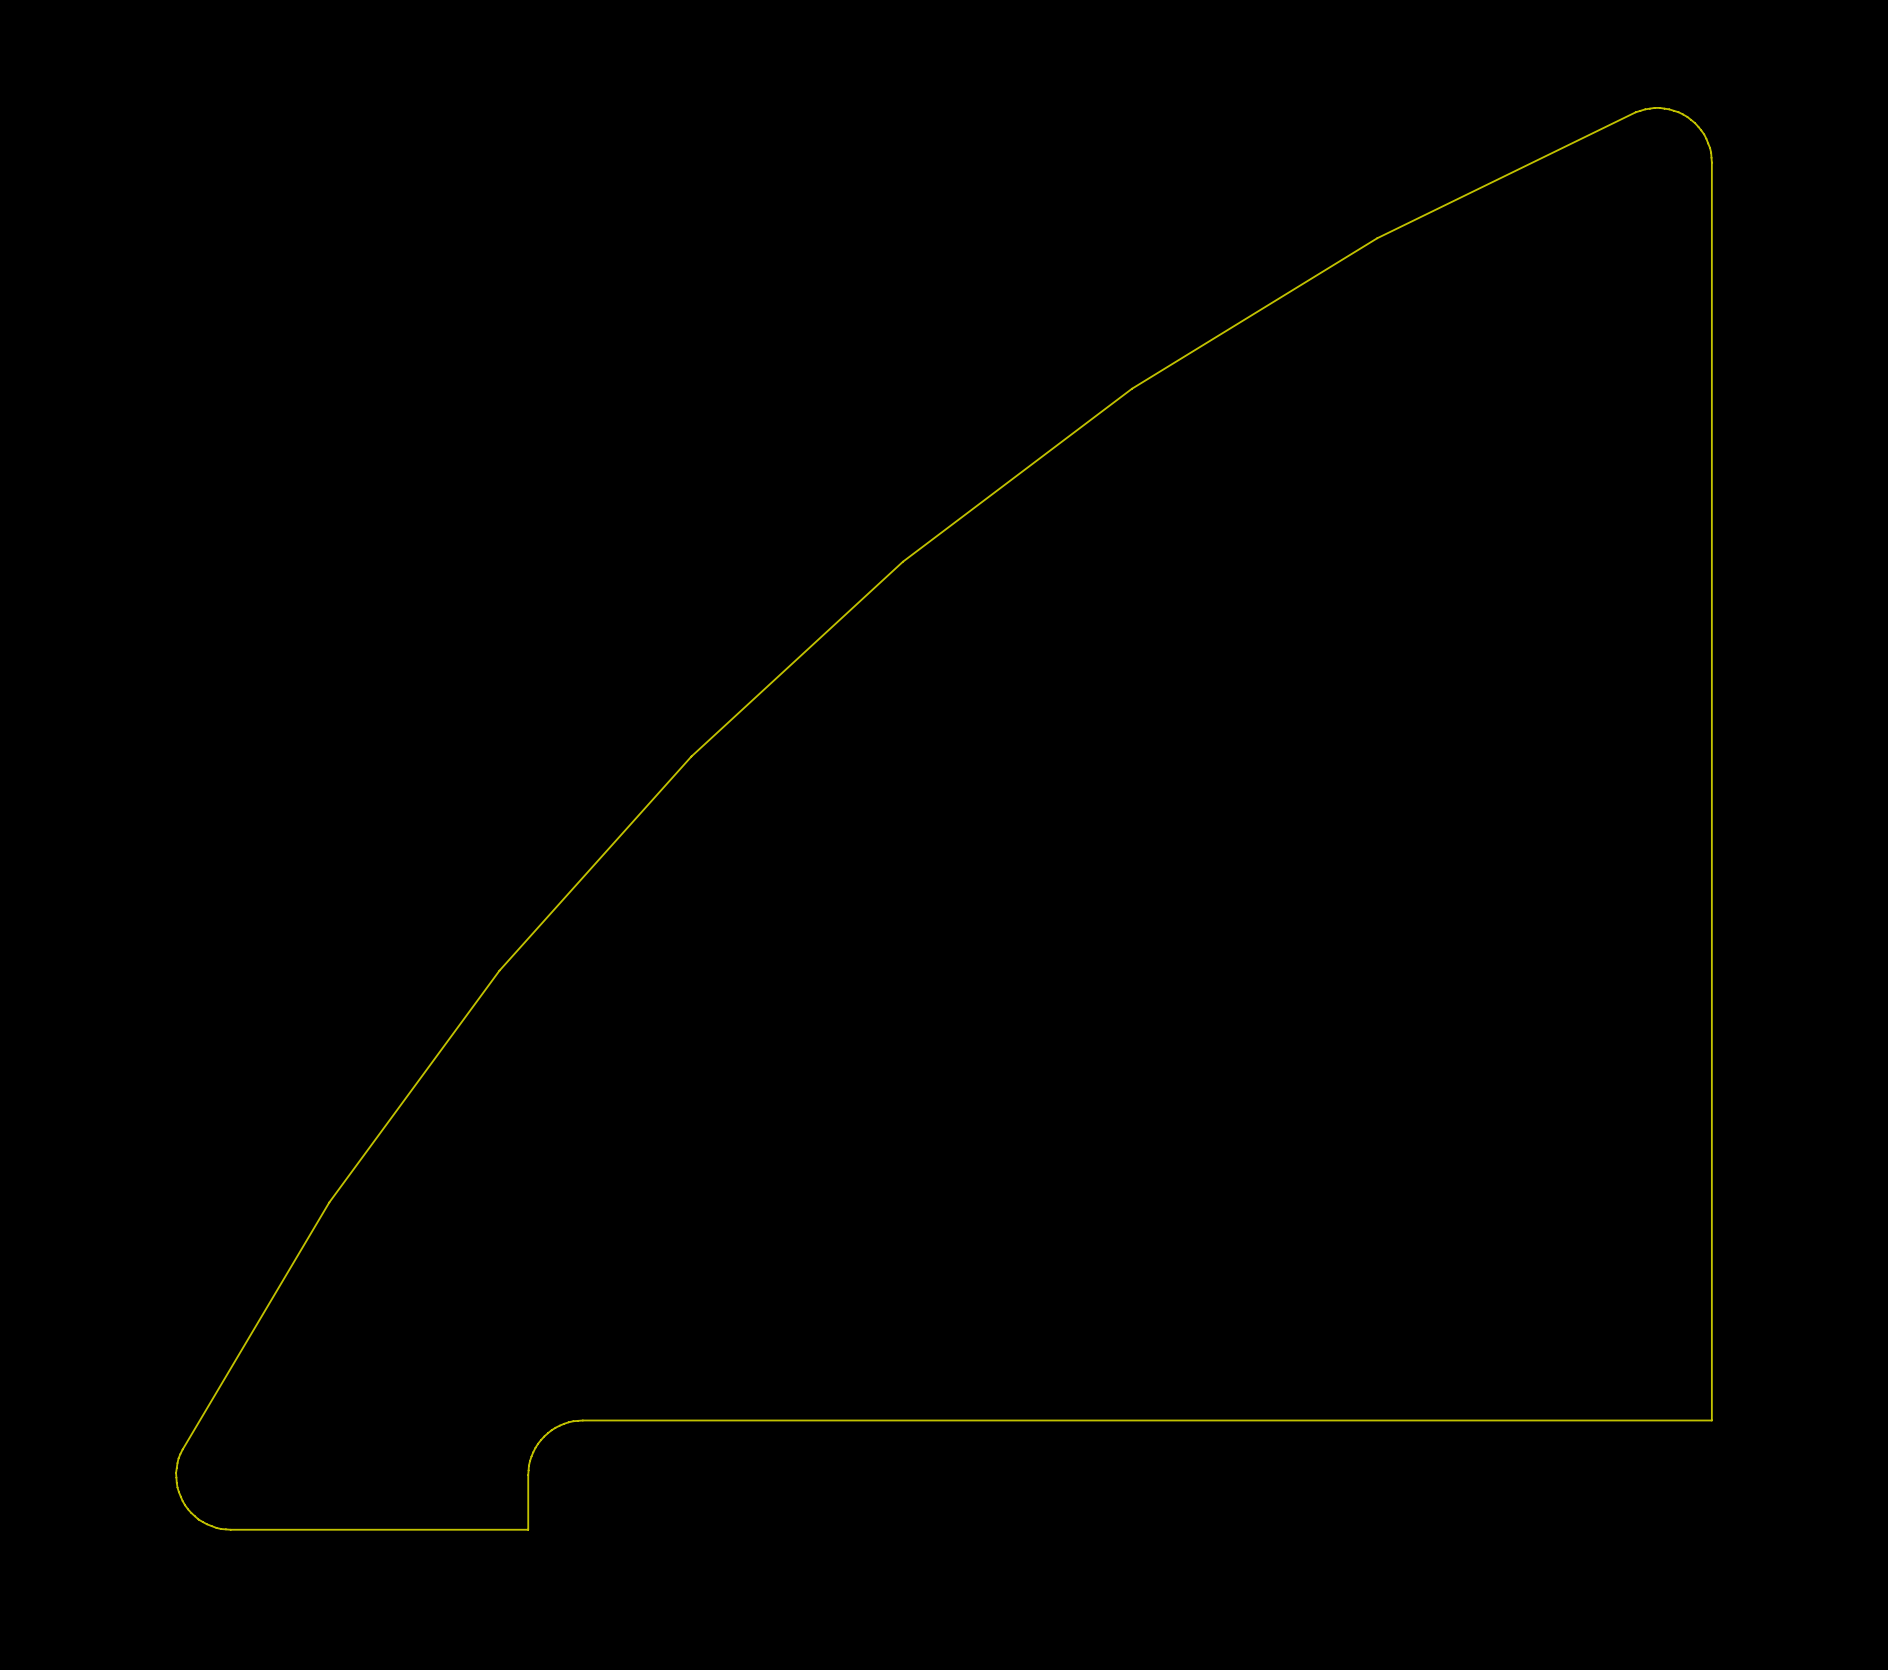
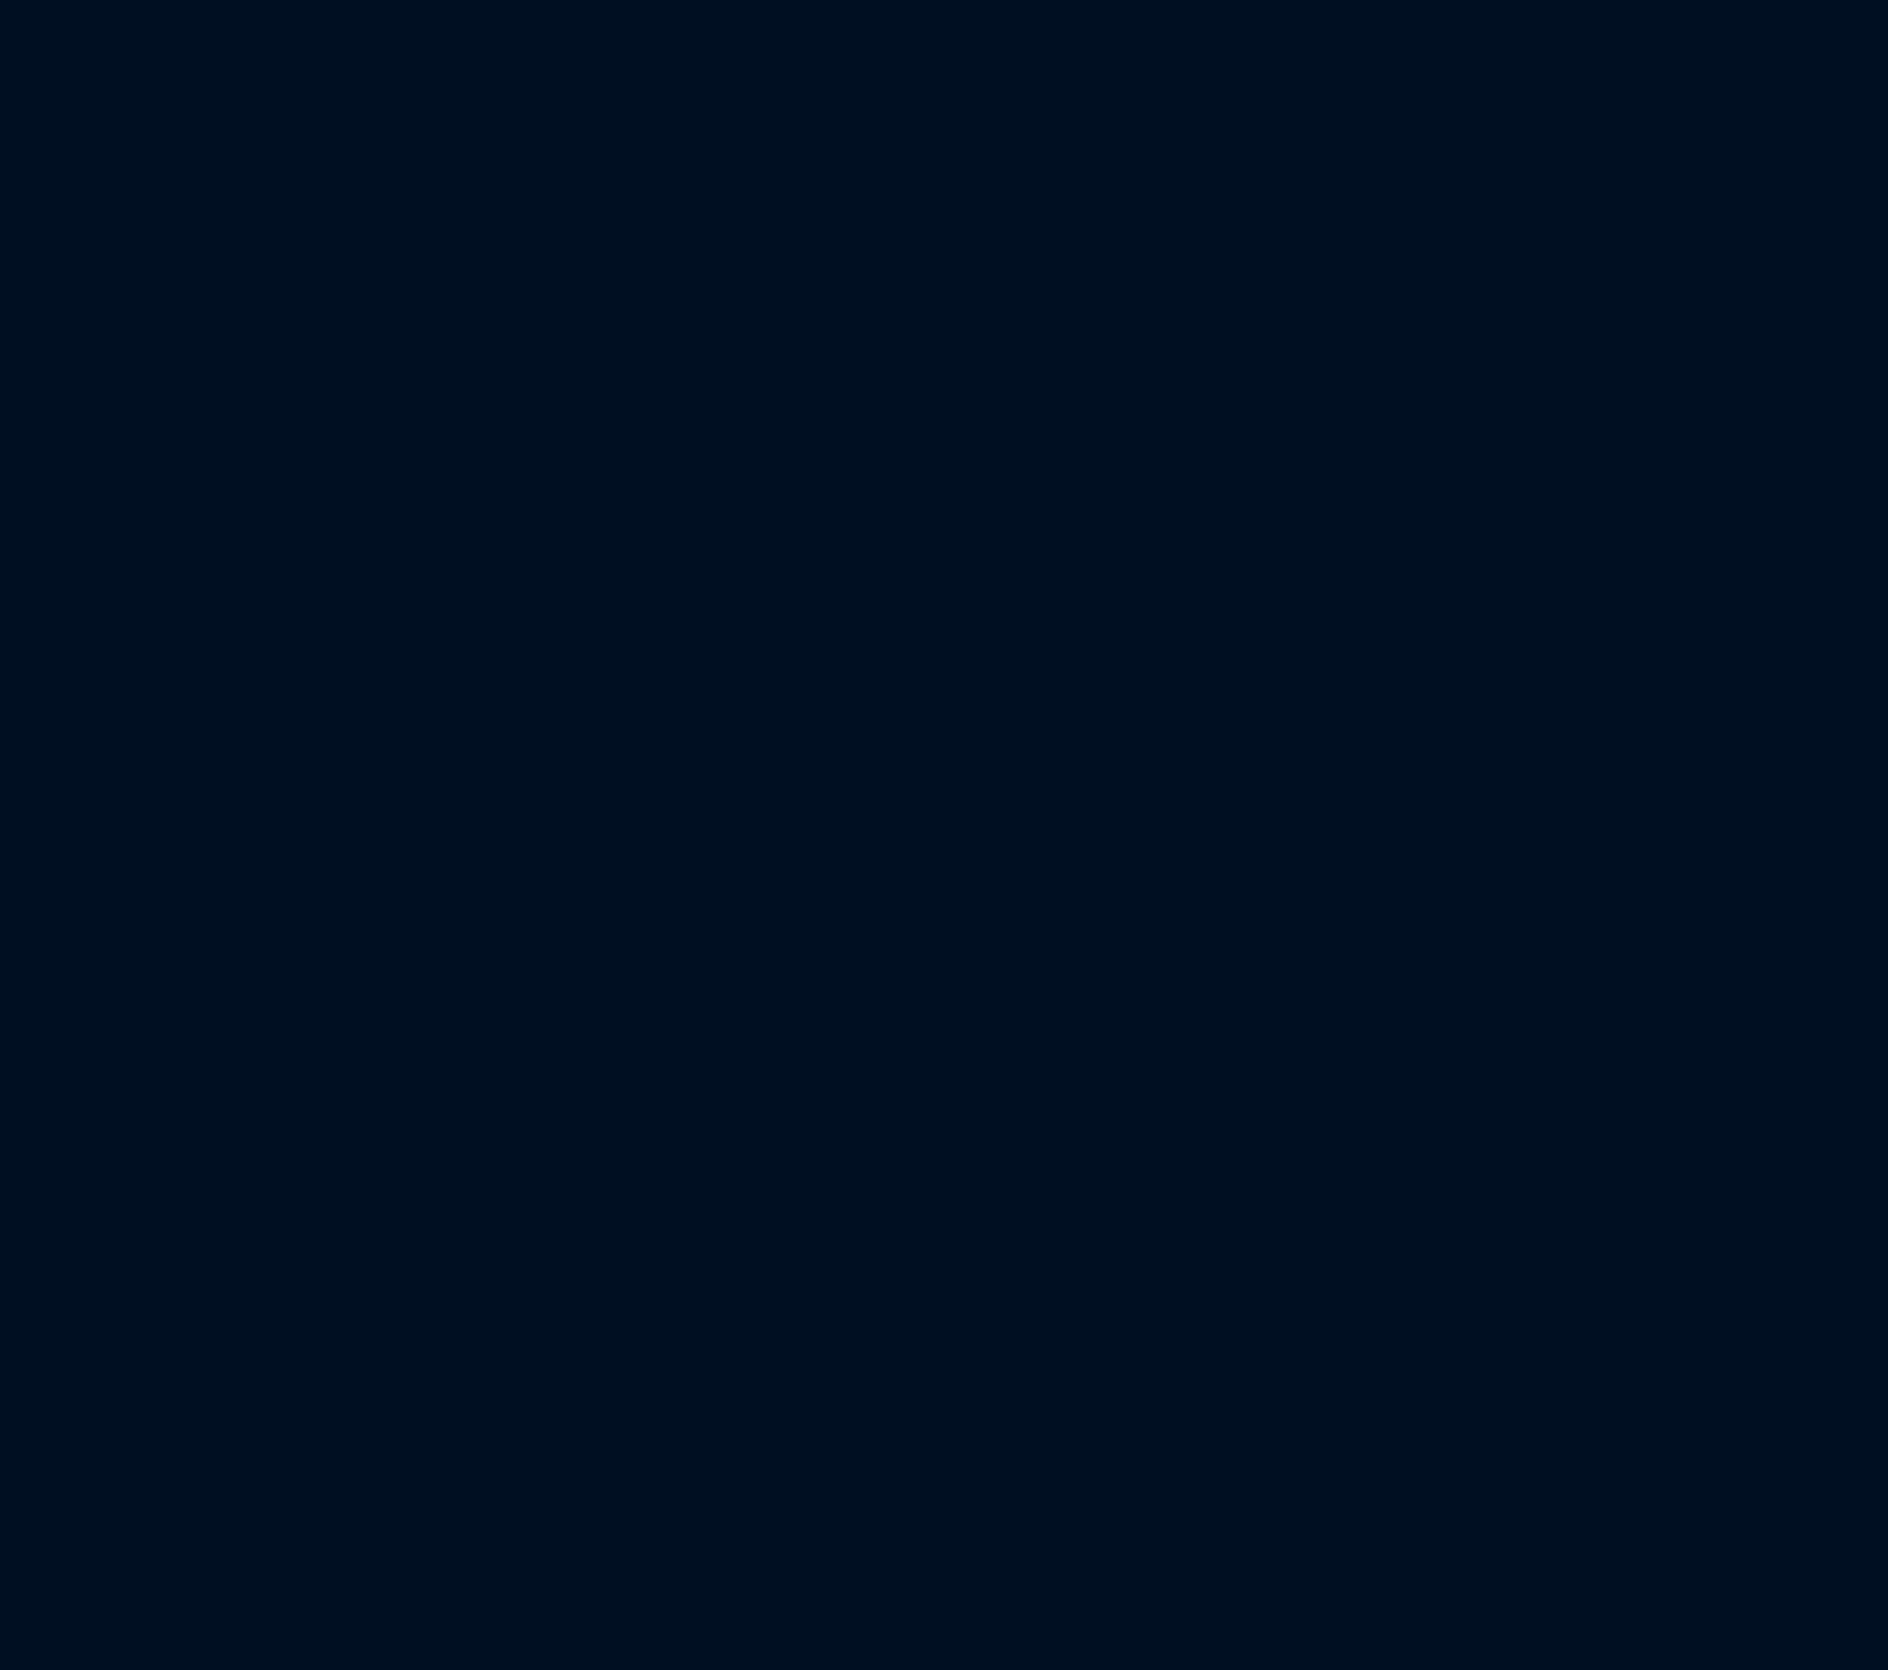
board edge: (1654, 107) (1678, 112) (1695, 123) (1706, 138) (1710, 147) (1711, 162) (1711, 1420) (582, 1420) (568, 1422) (551, 1430) (540, 1440) (533, 1452) (528, 1475) (528, 1529) (230, 1529) (207, 1524) (191, 1513) (182, 1500) (177, 1487) (176, 1472) (180, 1454) (329, 1202) (499, 970) (691, 756) (902, 561) (1132, 388) (1377, 238) (1635, 112) (1654, 107) -> none

